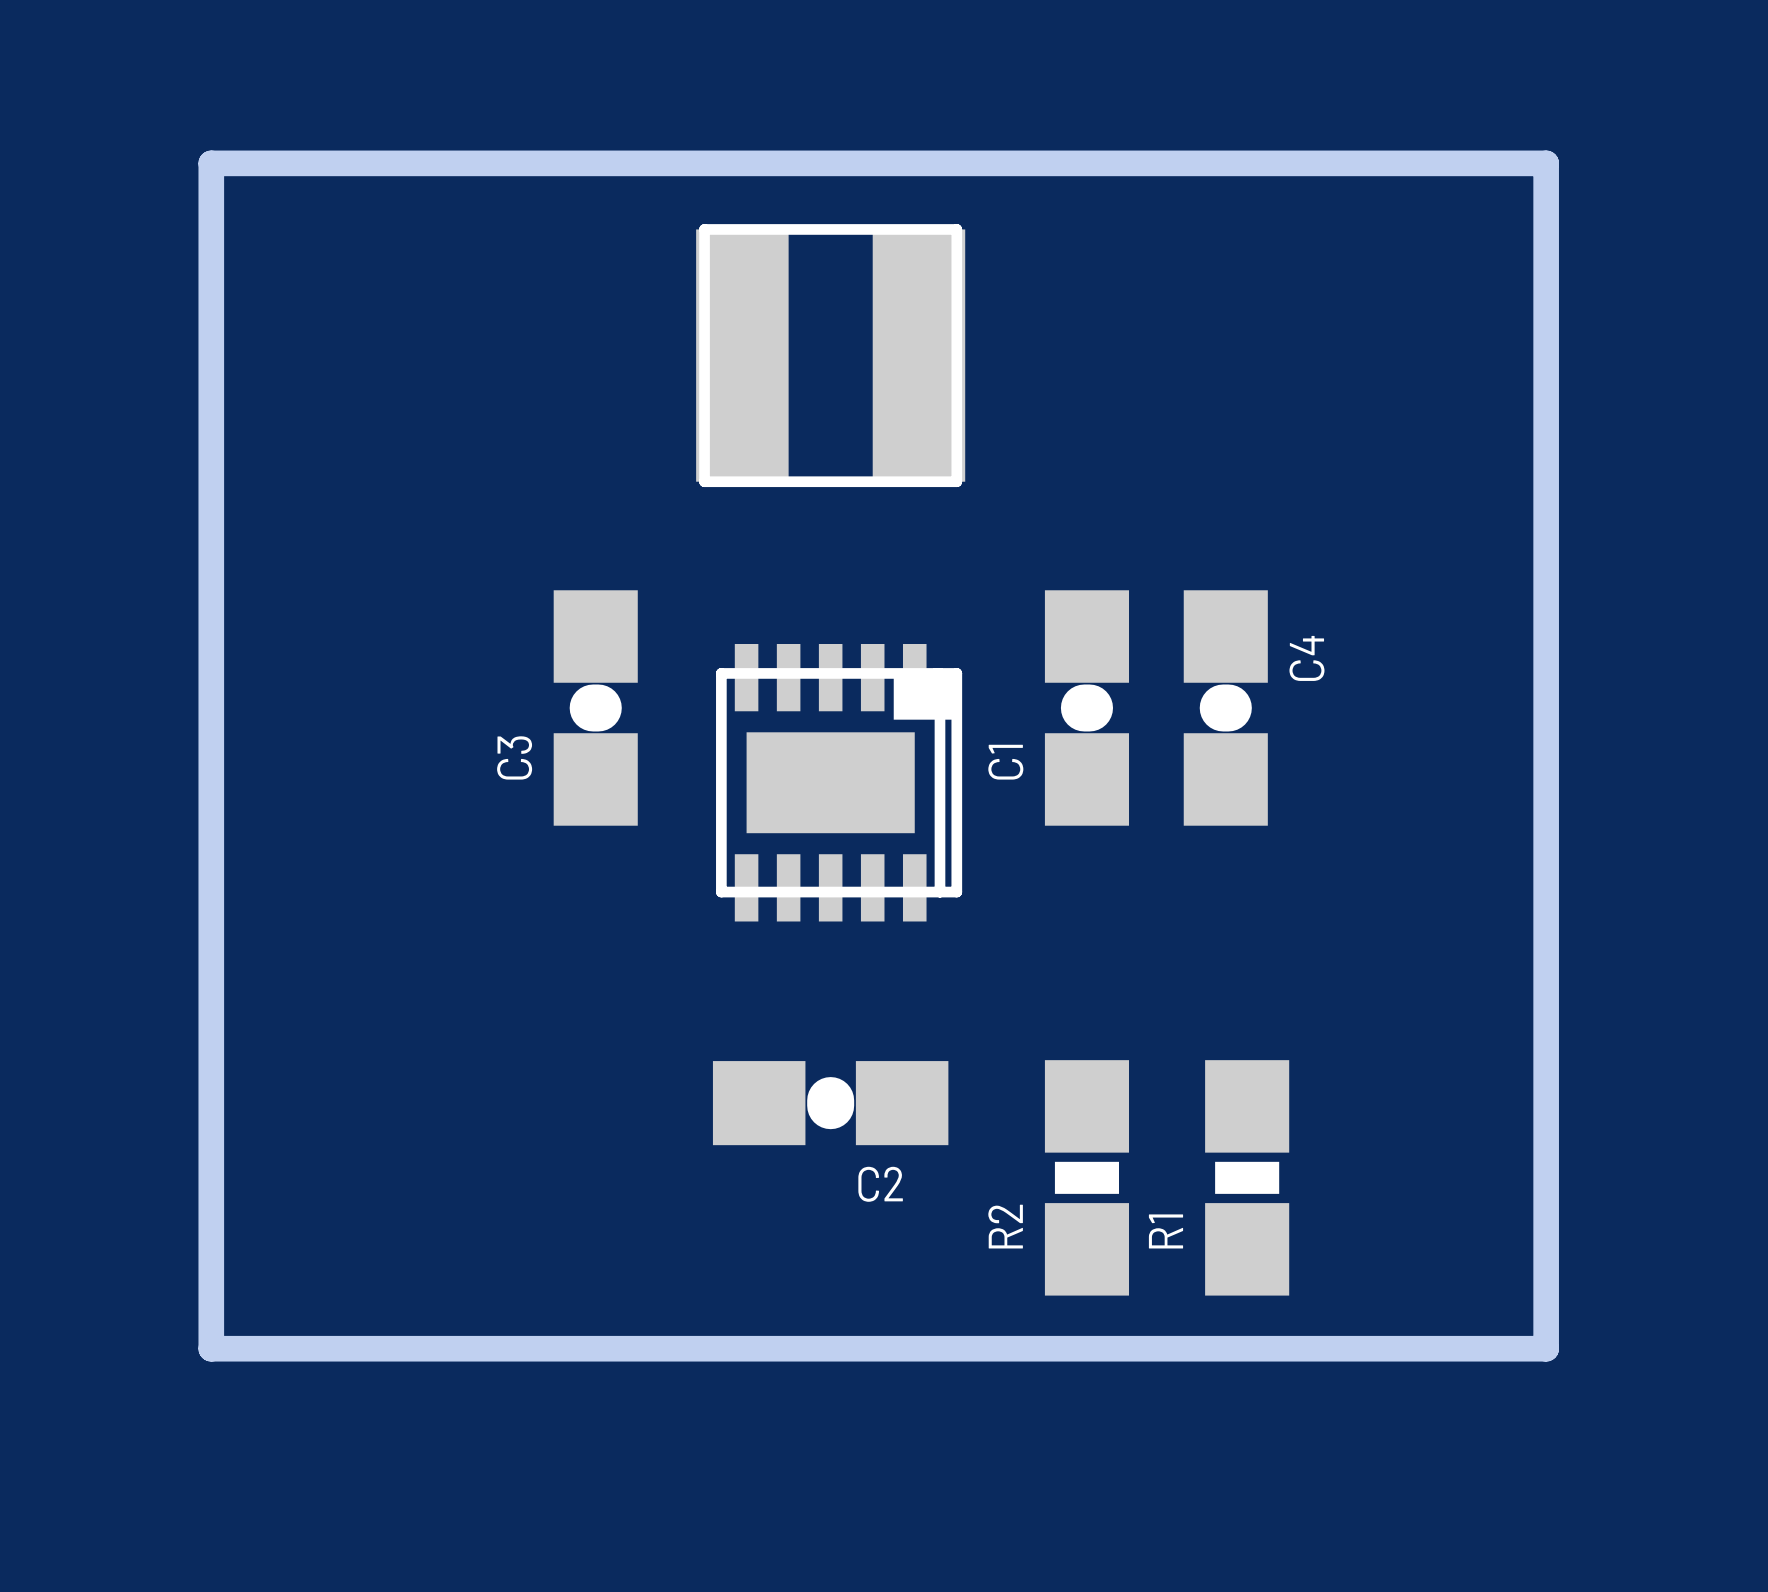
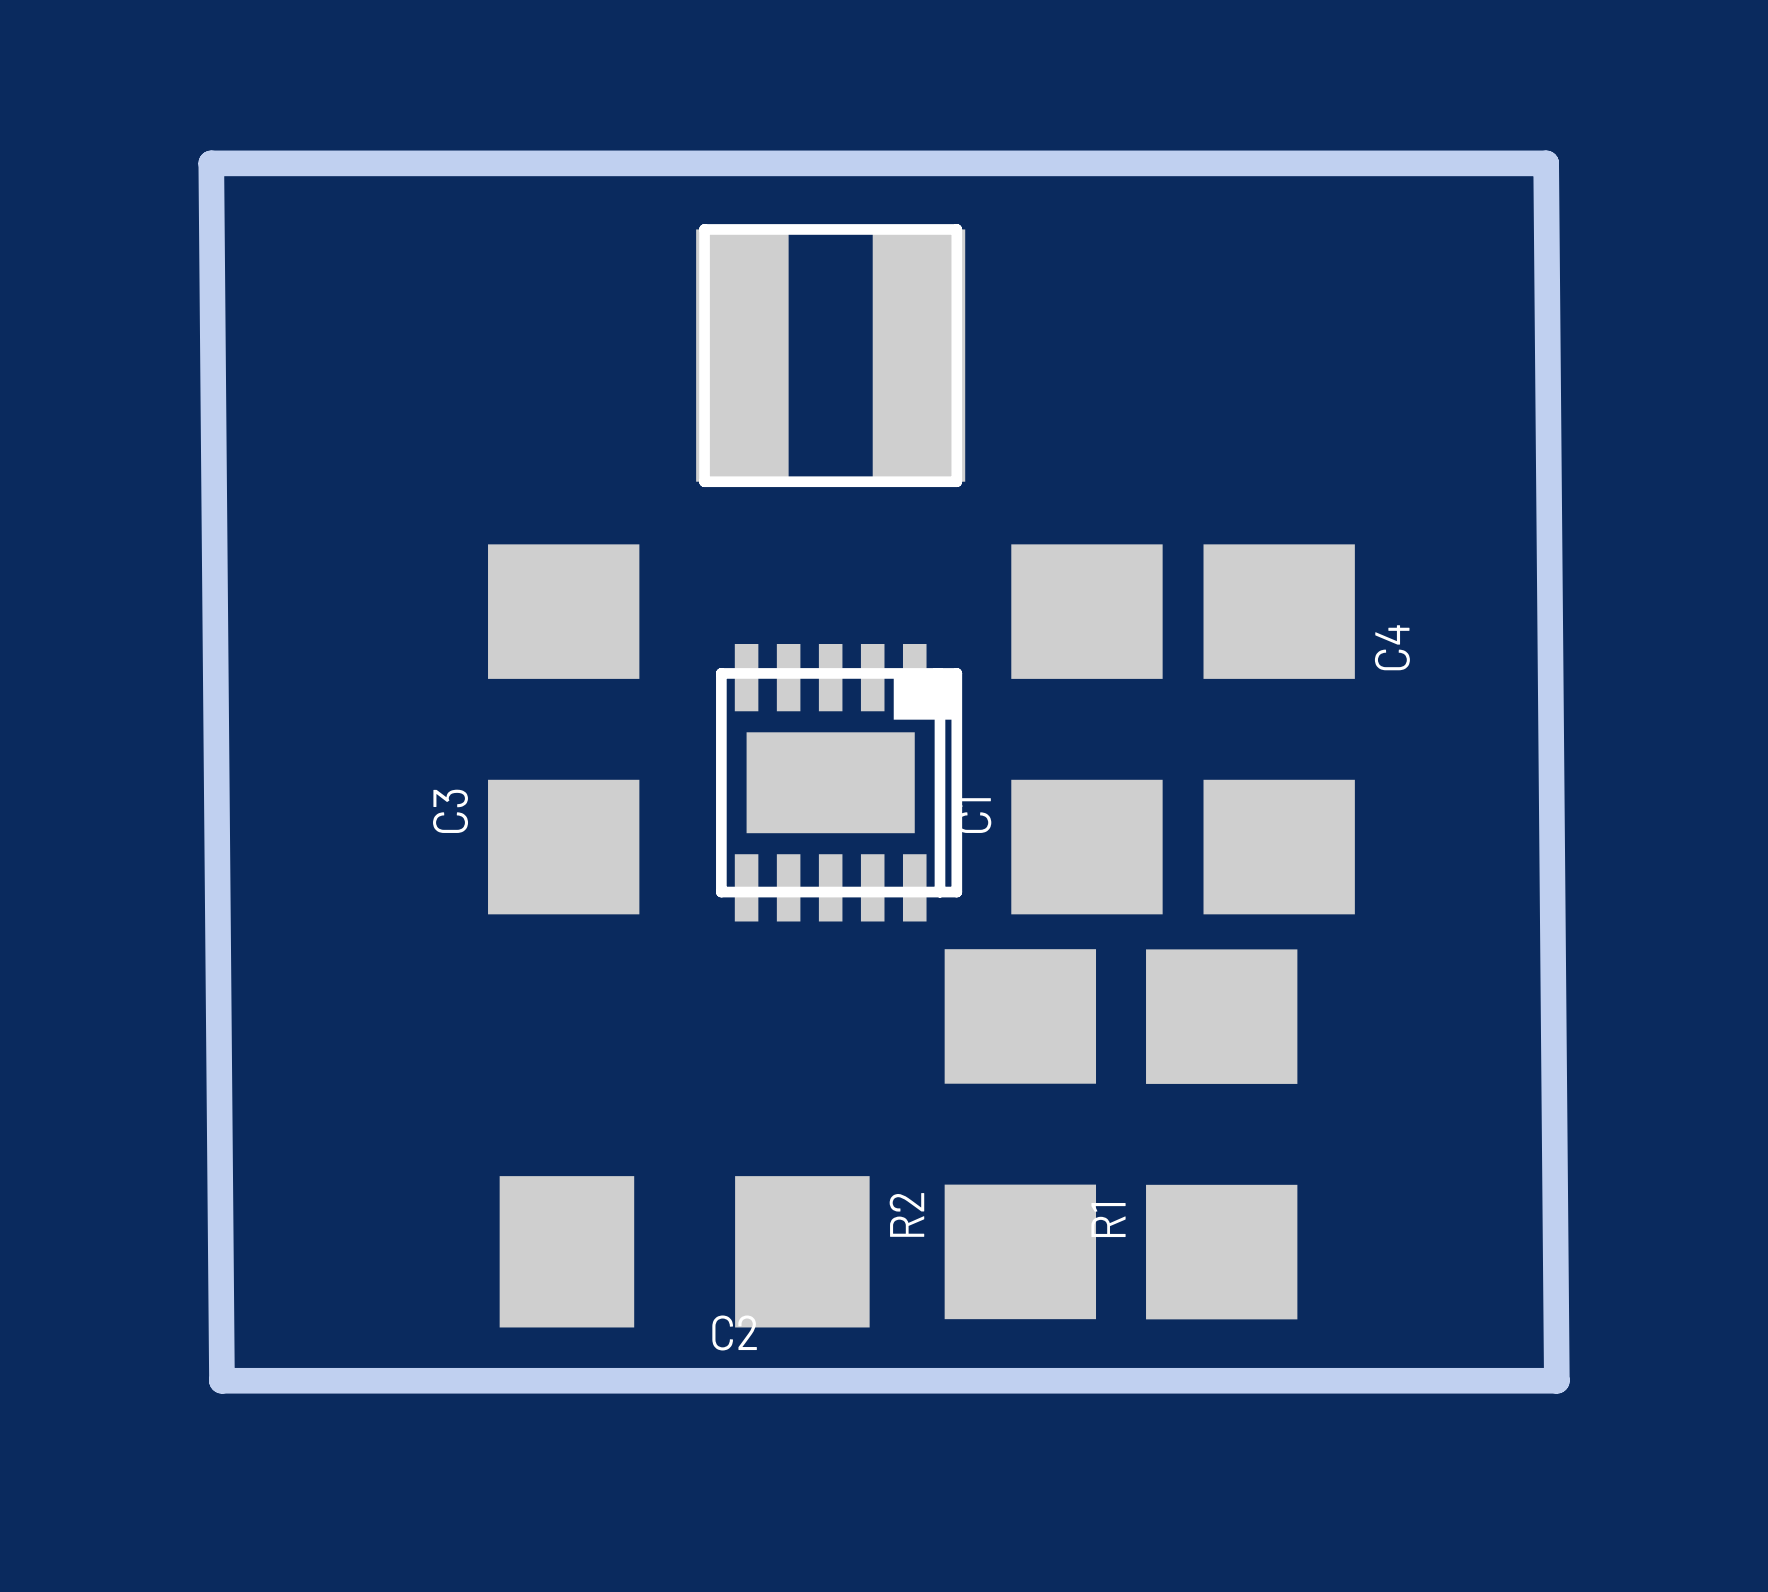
board edge: (211, 163) (211, 1348) (1546, 1348) (1546, 163) -> (211, 163) (221, 1380) (1556, 1380) (1546, 163)
C3 footprint: [553, 590, 638, 826] -> [488, 544, 640, 915]
C1 footprint: [1044, 590, 1130, 826] -> [1011, 544, 1163, 915]
C4 footprint: [1183, 590, 1268, 826] -> [1203, 544, 1355, 915]
R2 footprint: [1044, 1060, 1130, 1296] -> [944, 949, 1097, 1320]
R1 footprint: [1205, 1060, 1290, 1296] -> [1146, 949, 1298, 1320]
C2 footprint: [712, 1061, 949, 1146] -> [499, 1176, 870, 1328]

